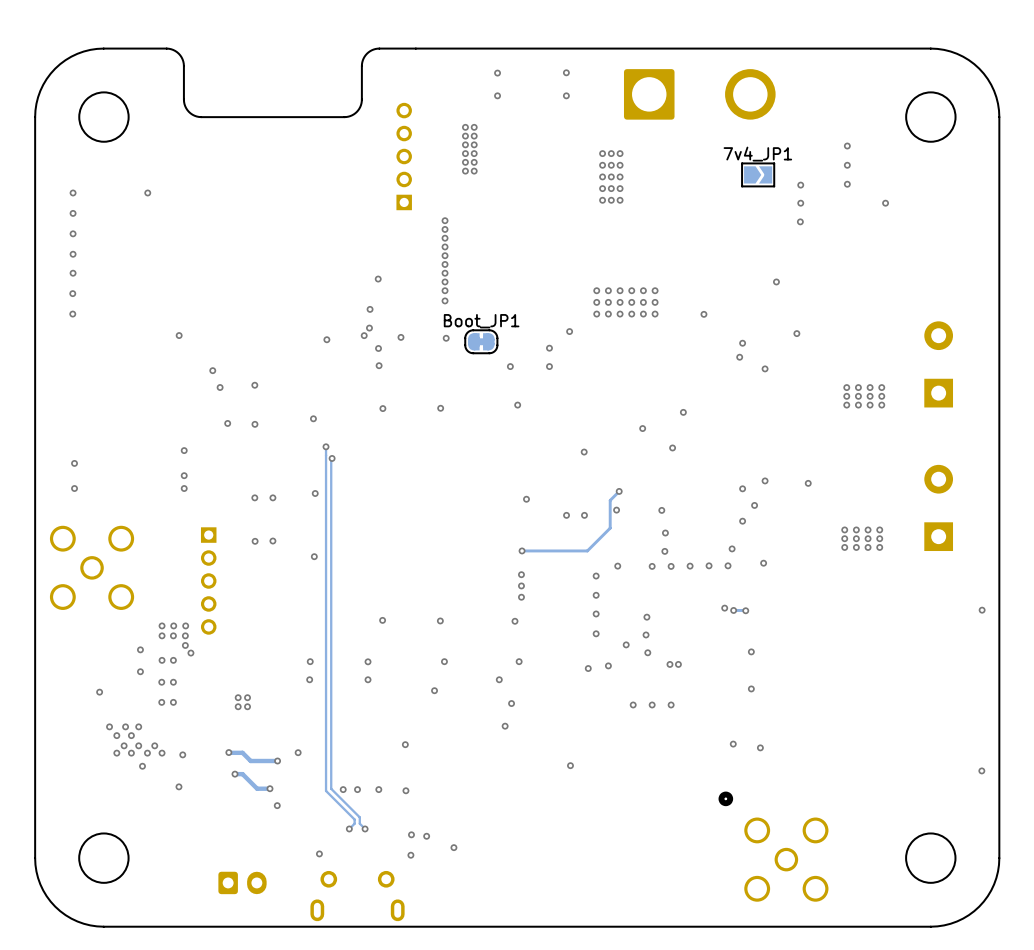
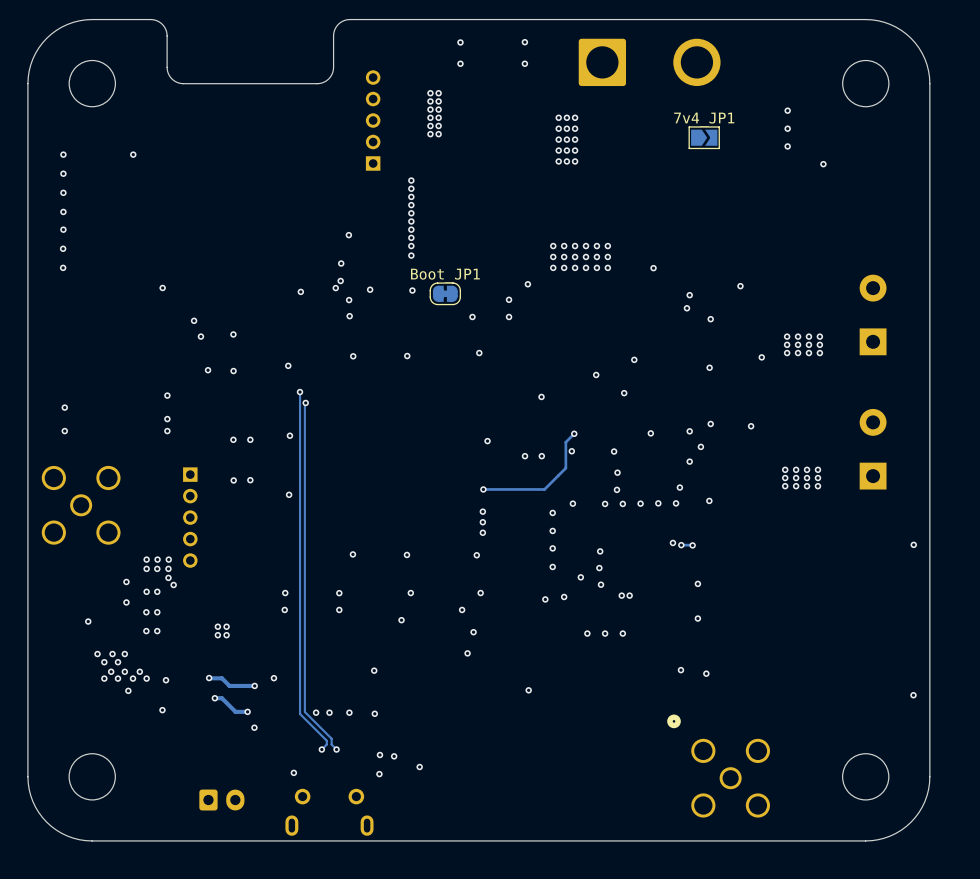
via: (800, 185) -> none
via: (800, 203) -> none
via: (800, 221) -> none
via: (776, 281) -> none
via: none -> (761, 357)
via: none -> (709, 367)
via: none -> (650, 433)

